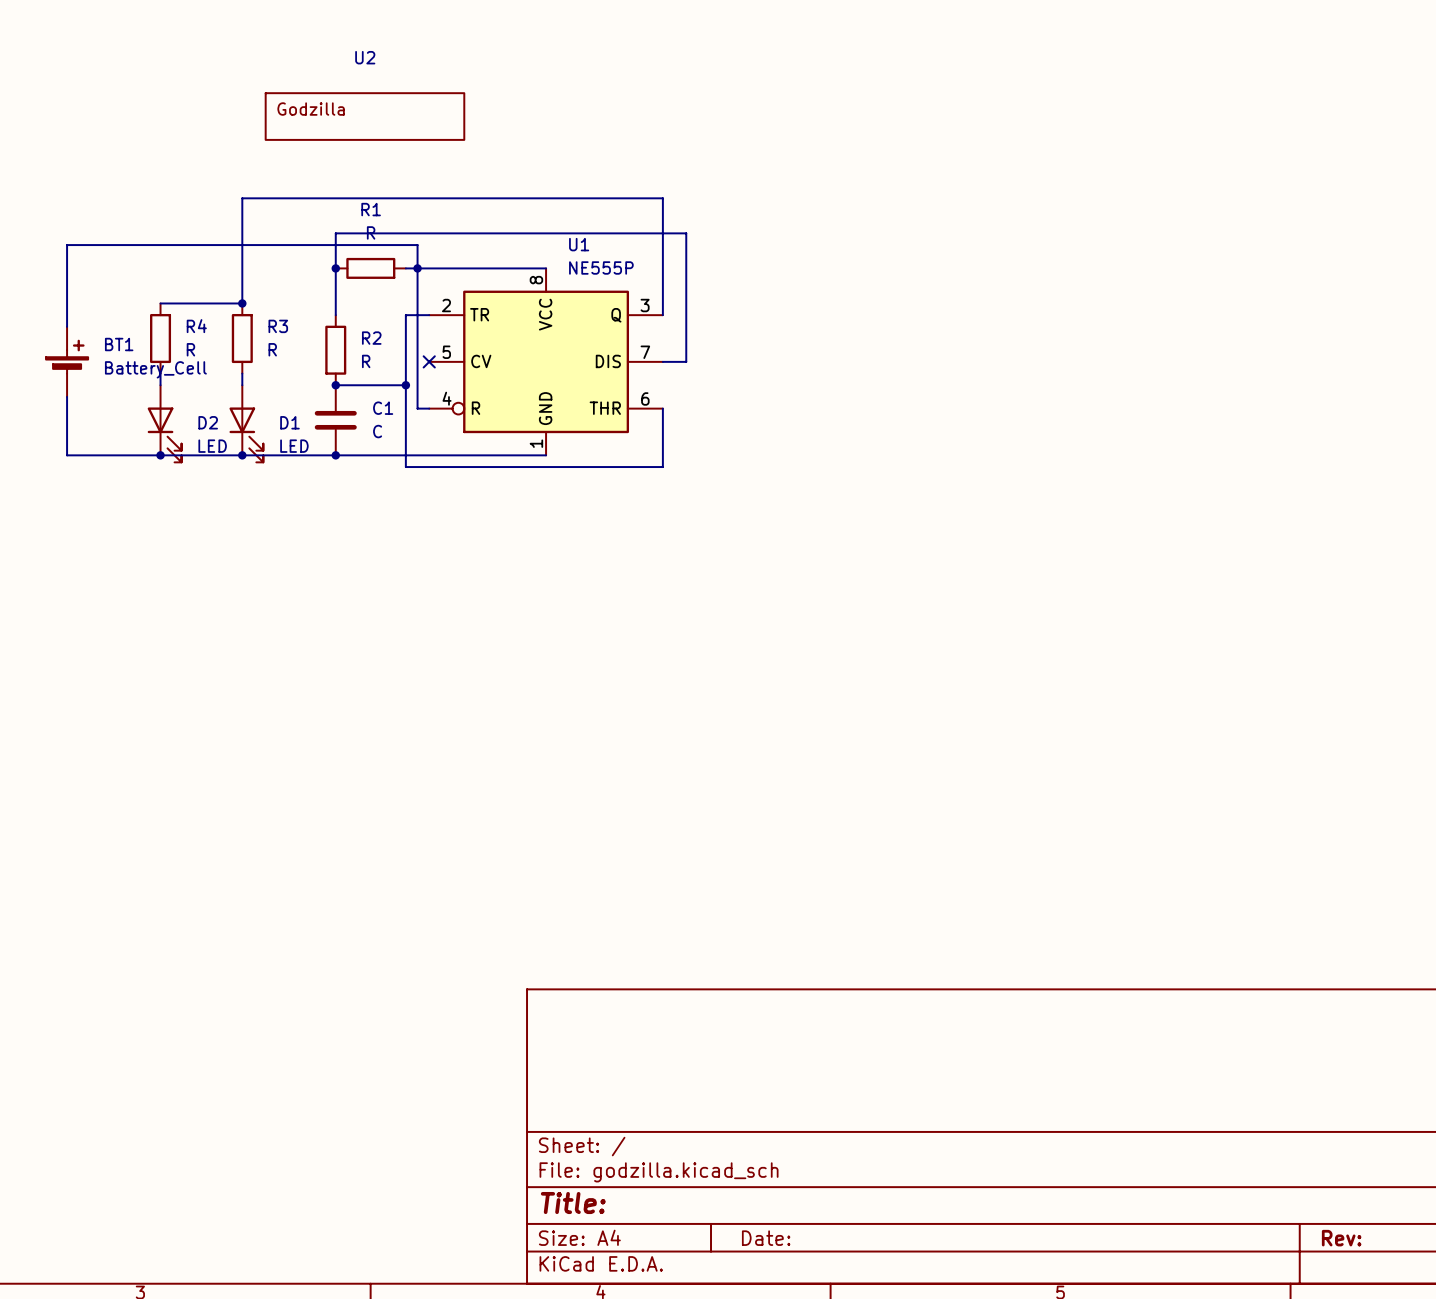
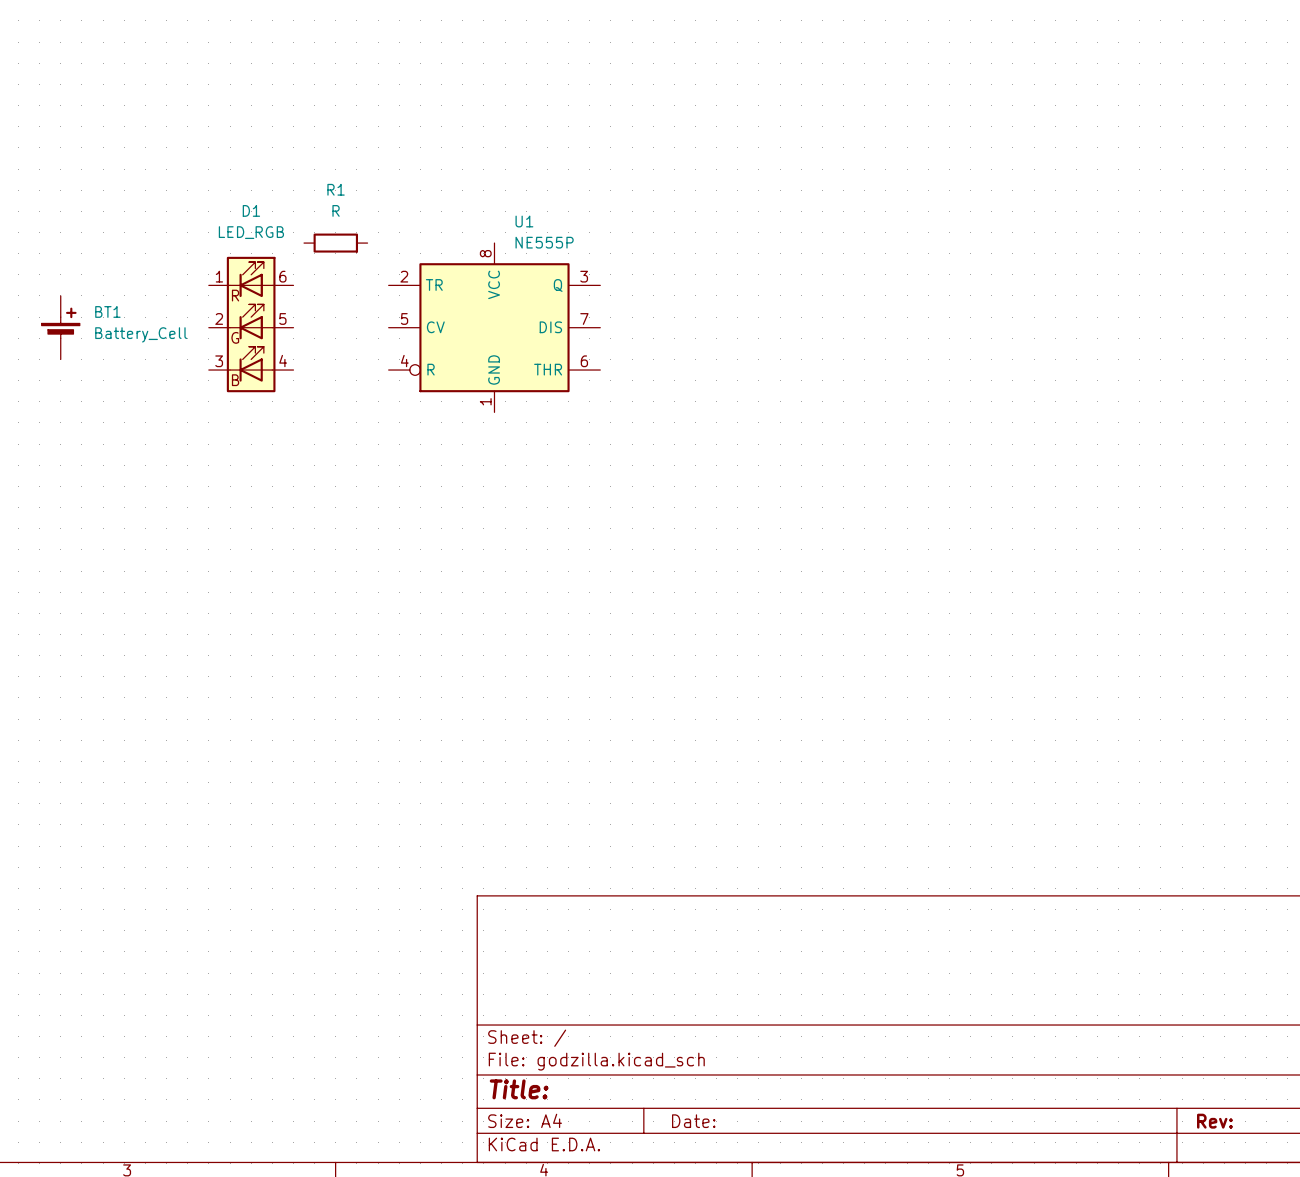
U2: (364, 116) -> none
junction: (335, 268) -> none
wire: (405, 268) (546, 268) -> none
junction: (417, 268) -> none
wire: (160, 303) (242, 303) (242, 198) (662, 198) (662, 315) -> none
junction: (242, 303) -> none
wire: (335, 315) (335, 233) (686, 233) (686, 361) (662, 361) -> none
wire: (429, 315) (405, 315) (405, 467) (662, 467) (662, 408) -> none
wire: (67, 326) (67, 245) (417, 245) (417, 408) (429, 408) -> none
R4: R (160, 338) -> none
R3: R (242, 338) -> none
R2: R (335, 350) -> none
no-connect mark: (429, 361) -> none
wire: (160, 373) (160, 385) -> none
wire: (242, 373) (242, 385) -> none
D1 symbol: [229, 385, 264, 463] -> [208, 256, 294, 393]
wire: (335, 385) (405, 385) -> none
junction: (335, 385) -> none
junction: (405, 385) -> none
wire: (67, 396) (67, 455) (546, 455) -> none
C1: C (335, 420) -> none
D1 name position: D1 (289, 422) -> D1 (251, 210)
D2: LED (164, 423) -> none
D1 value: LED (294, 446) -> LED_RGB (251, 232)
junction: (160, 455) -> none
junction: (242, 455) -> none
junction: (335, 455) -> none

